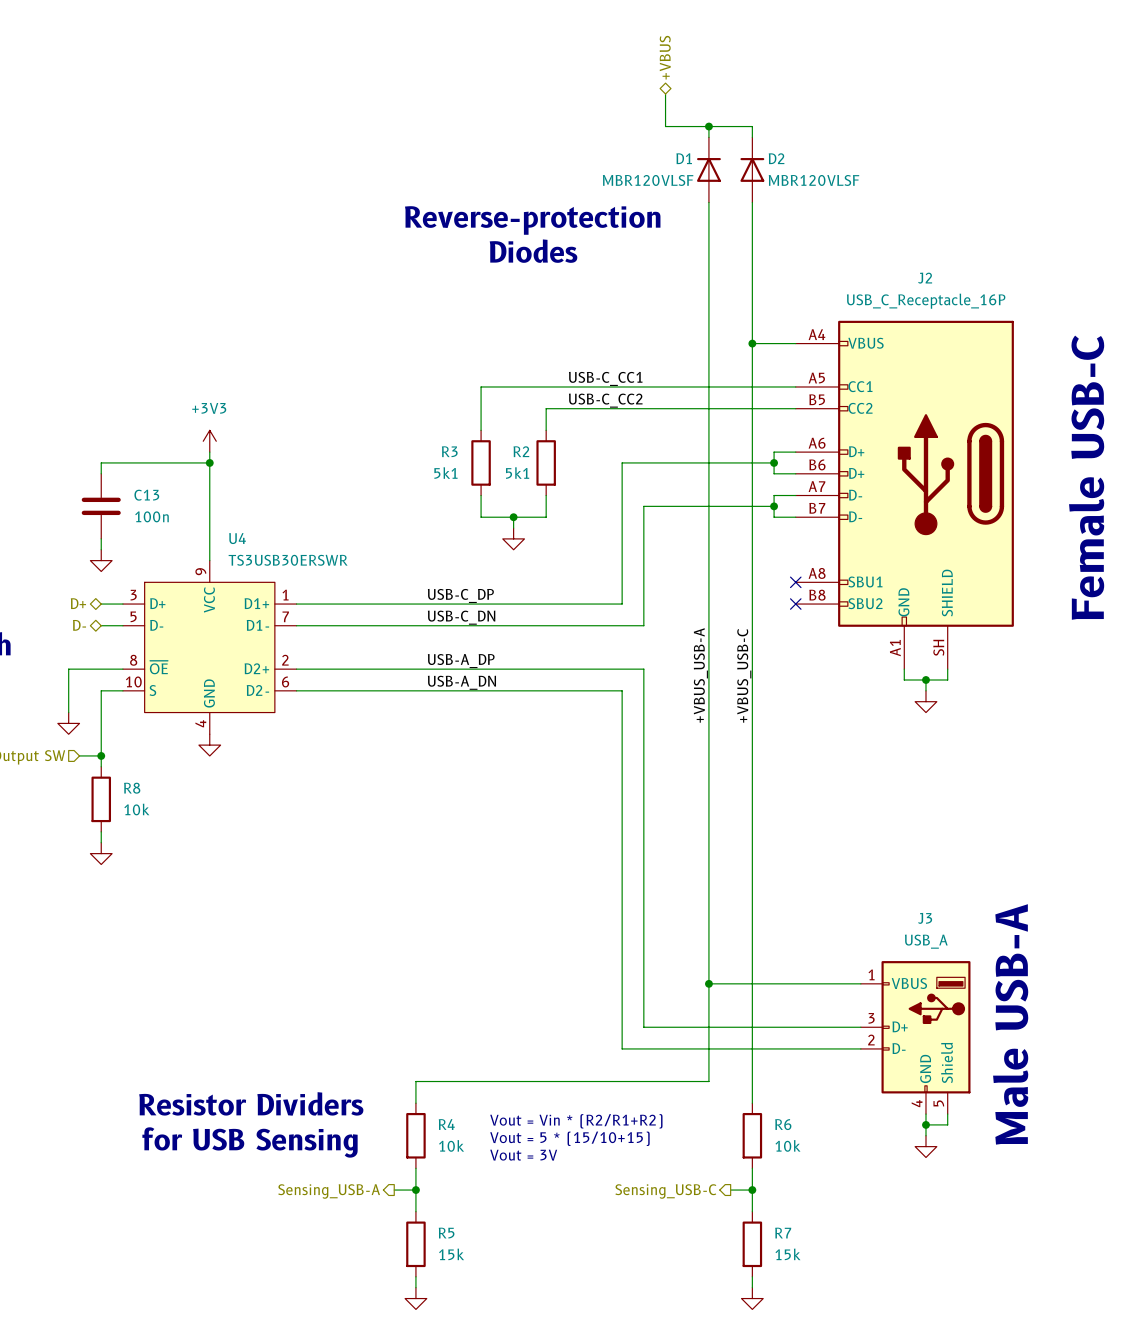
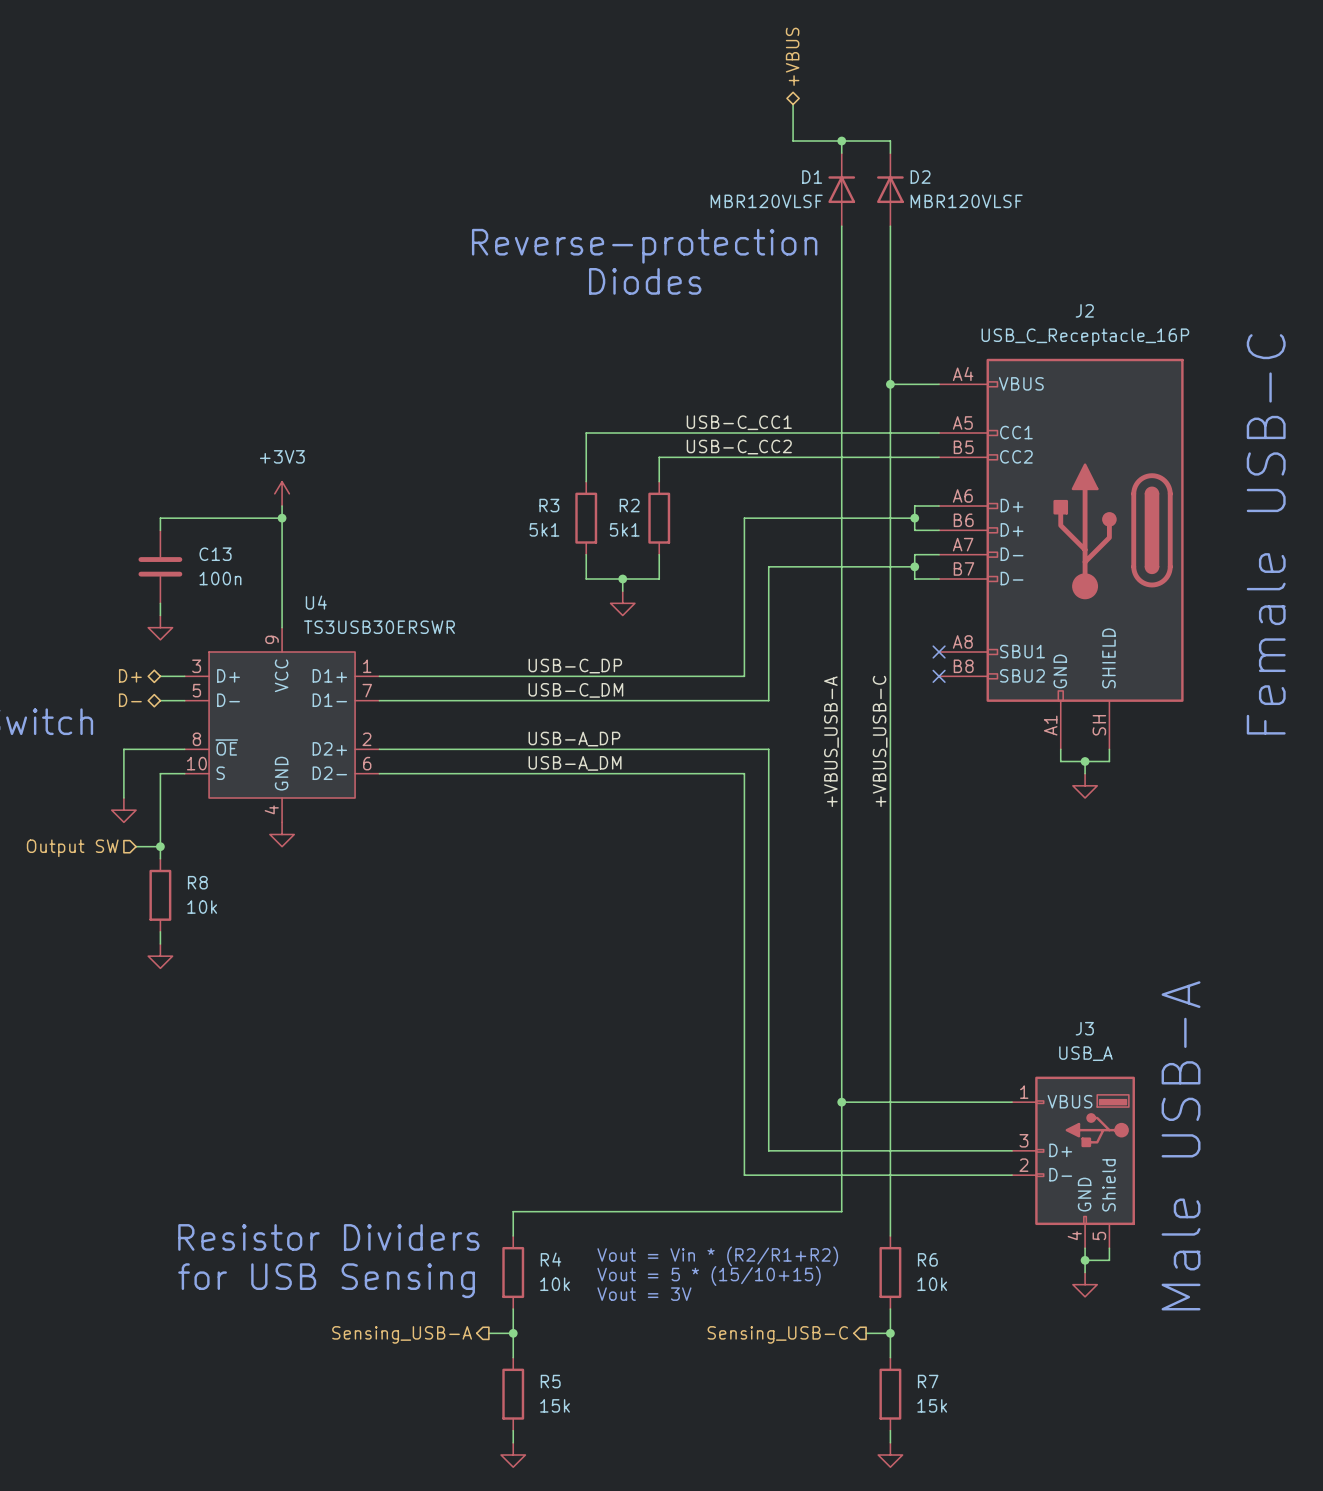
label: USB-C_DN (461, 617) -> USB-C_DM (575, 690)
label: USB-A_DN (461, 682) -> USB-A_DM (575, 763)

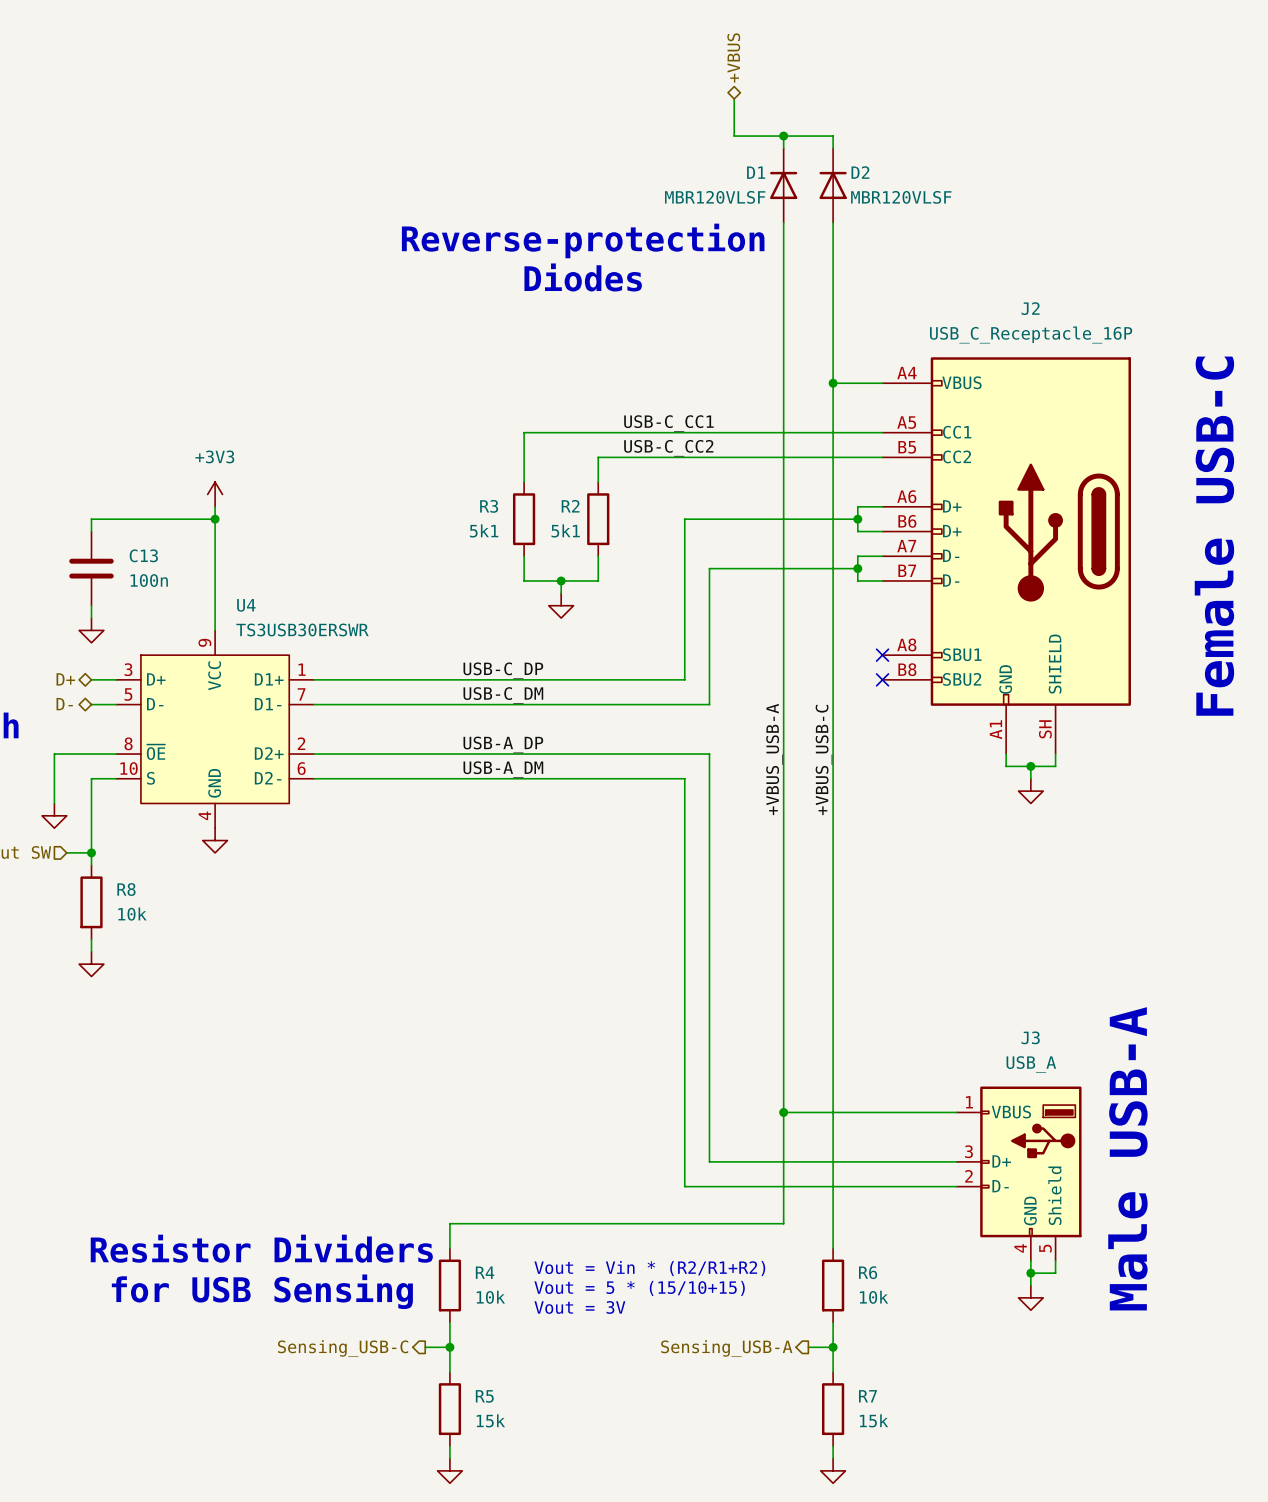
hierarchical label: Sensing_USB-A (402, 1334) -> Sensing_USB-C (343, 1348)
hierarchical label: Sensing_USB-C (777, 1334) -> Sensing_USB-A (726, 1348)

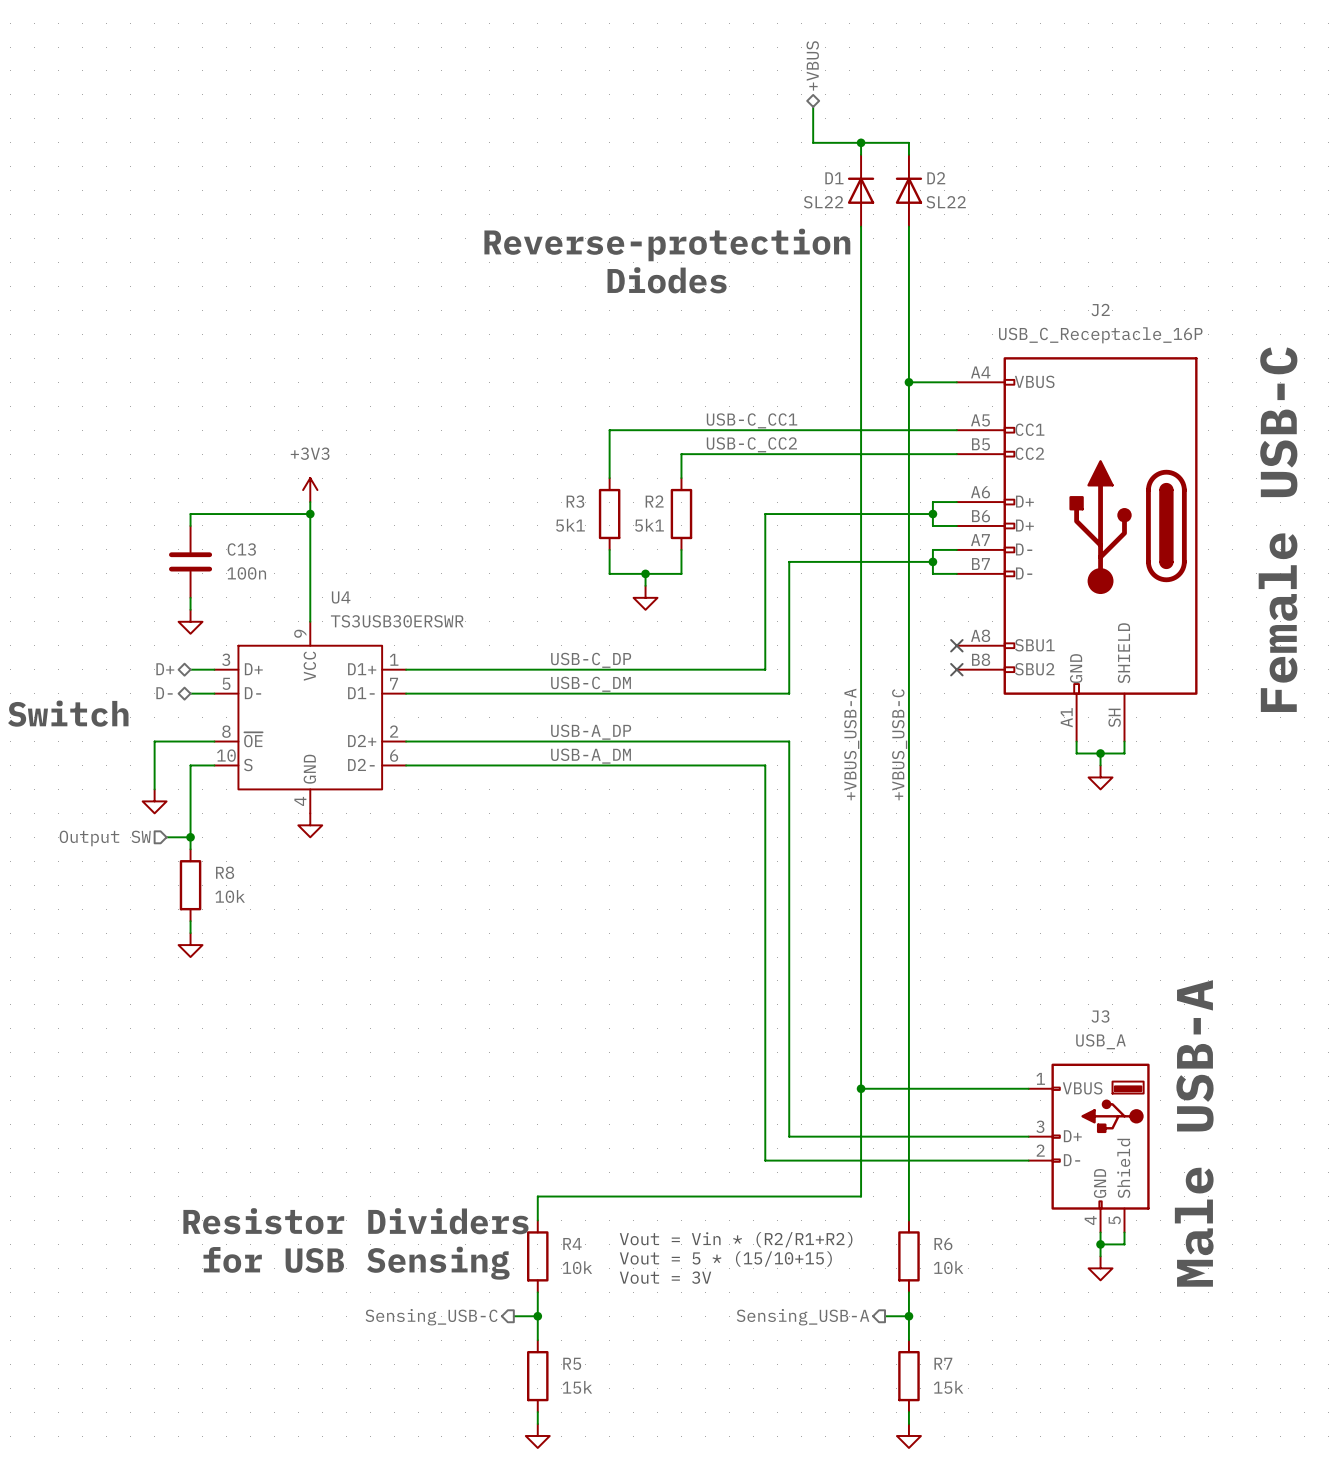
D1 value: MBR120VLSF (715, 197) -> SL22 (823, 202)
D2 value: MBR120VLSF (901, 197) -> SL22 (946, 202)

